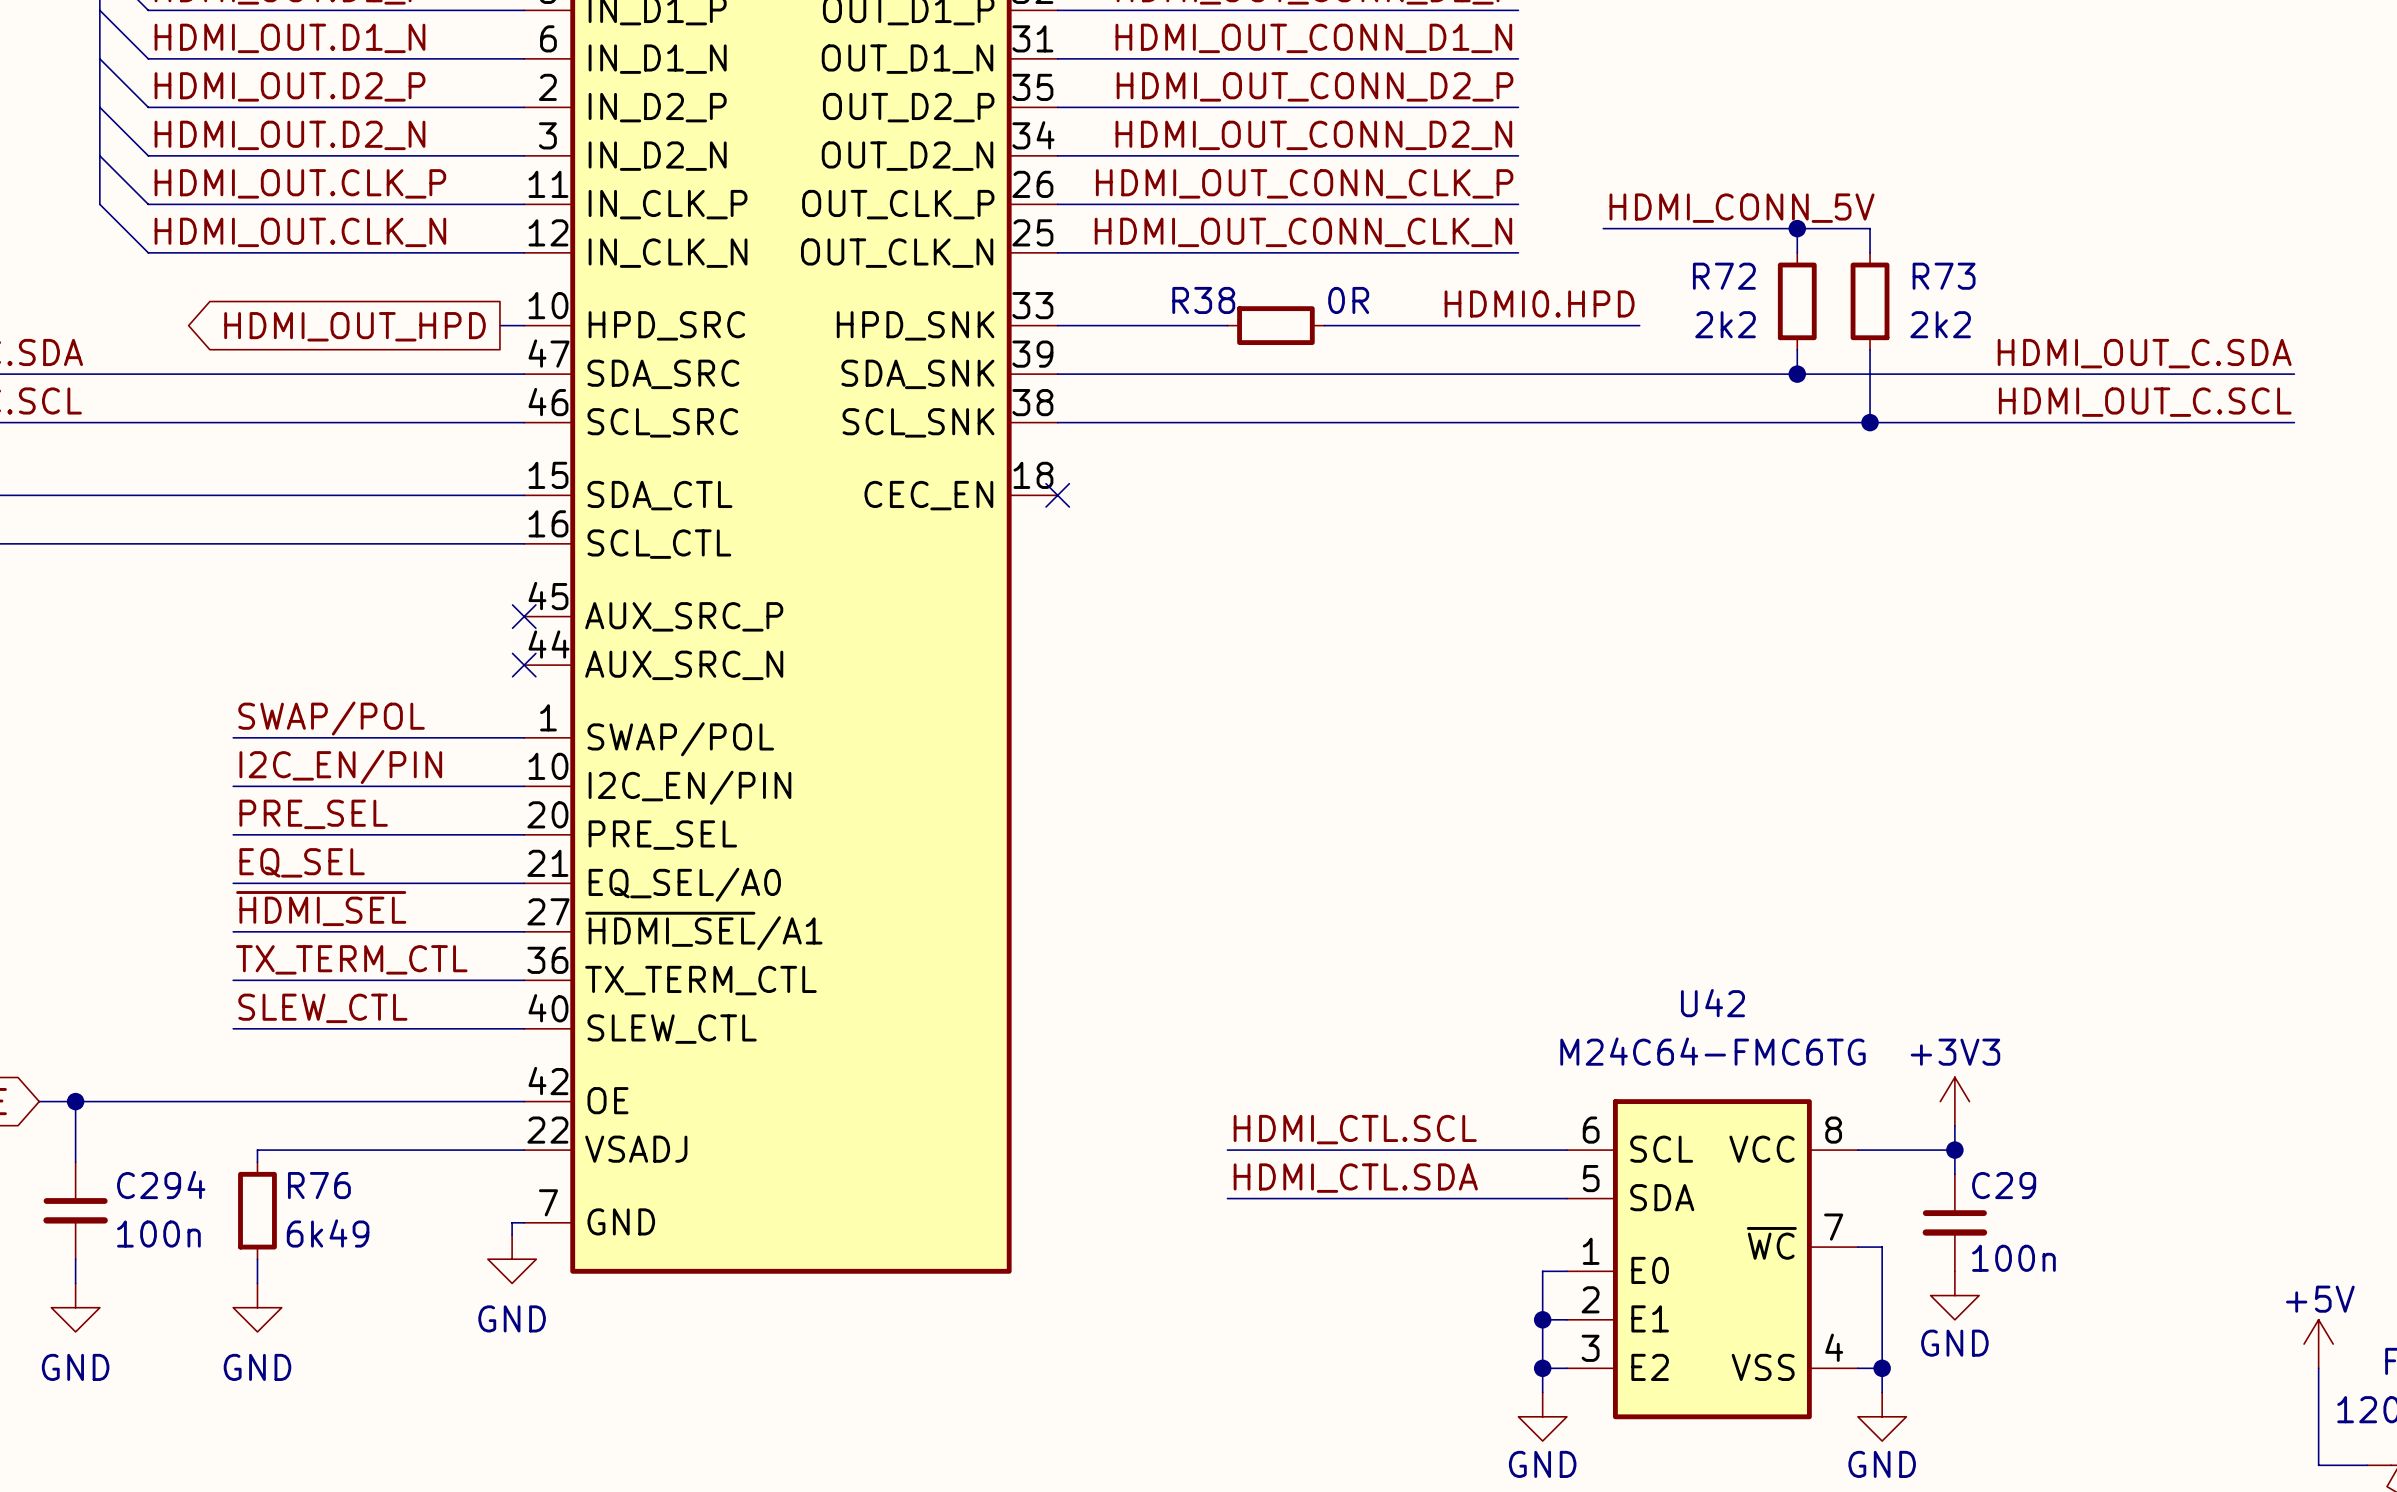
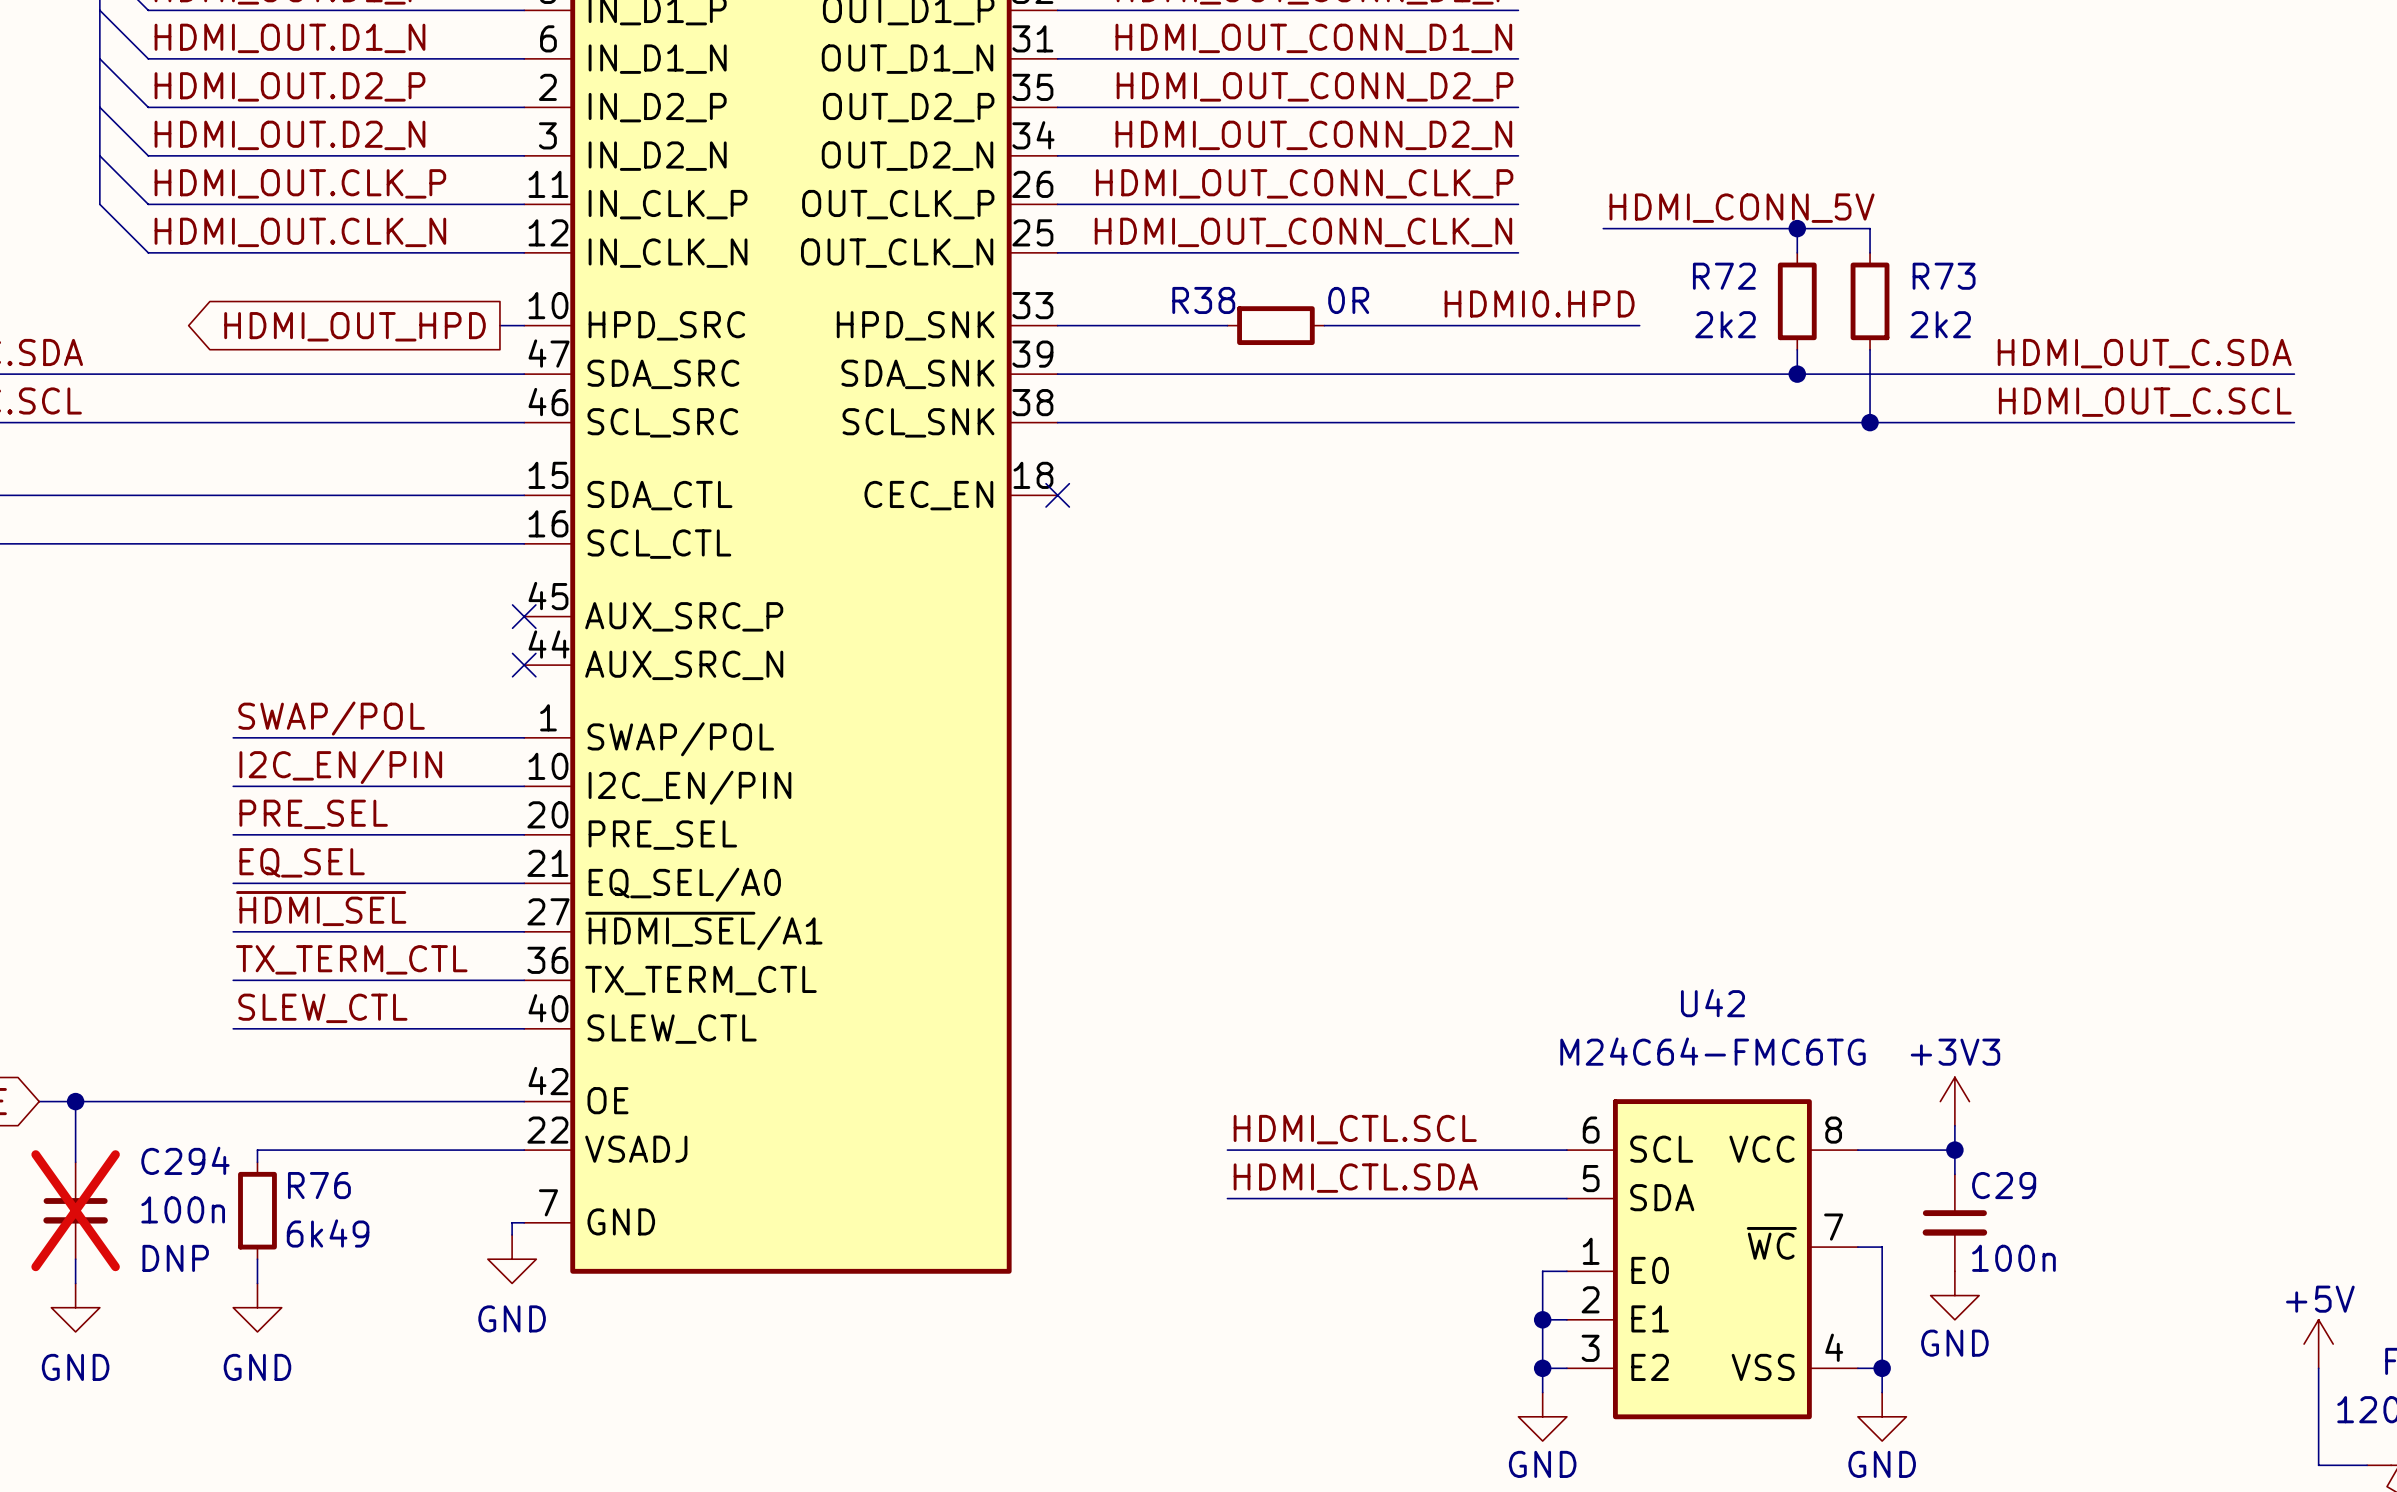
C294 name position: C294 (161, 1184) -> C294 (185, 1160)
C294 do-not-place cross: none -> (75, 1210)
C294 text position: 100n (158, 1234) -> 100n (183, 1209)
C294 text: none -> DNP (175, 1258)

